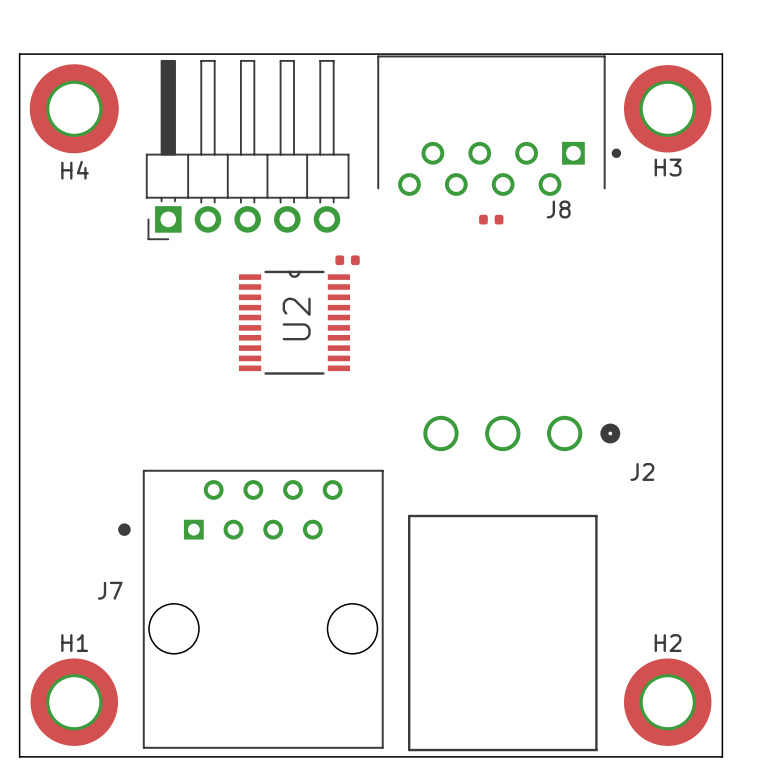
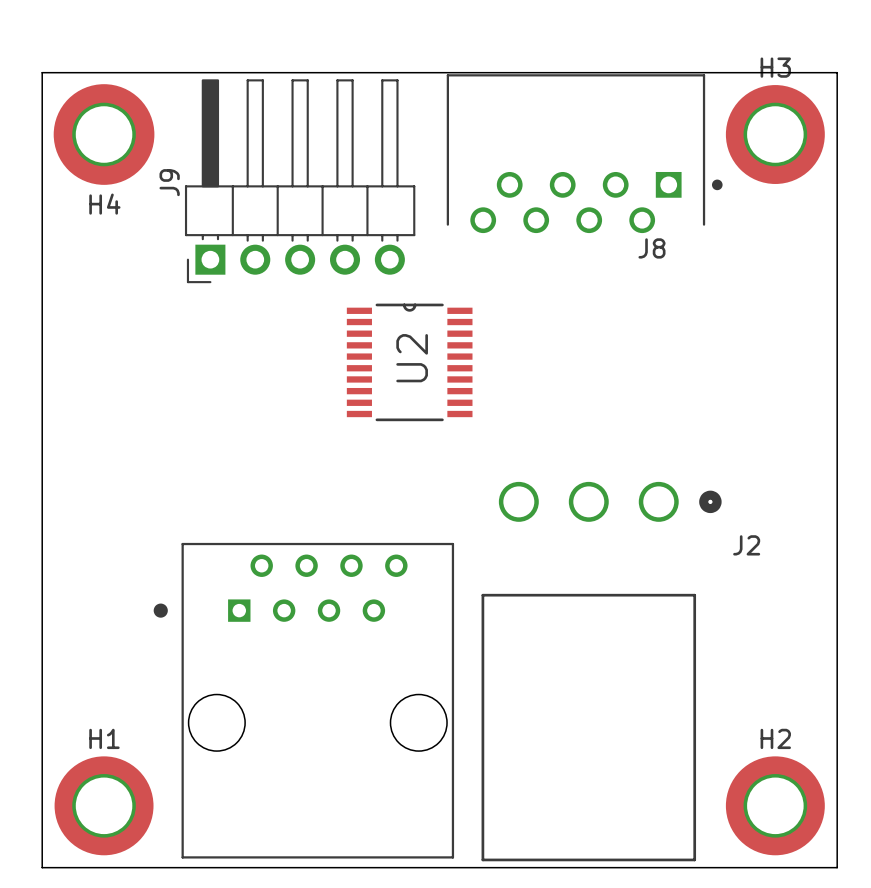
J9 name: none -> J9 (169, 182)
H3 name position: H3 (668, 167) -> H3 (775, 67)
part: (491, 219) -> none
part: (347, 260) -> none
U2 position: (294, 322) -> (409, 362)
J7 name: J7 (110, 590) -> none

